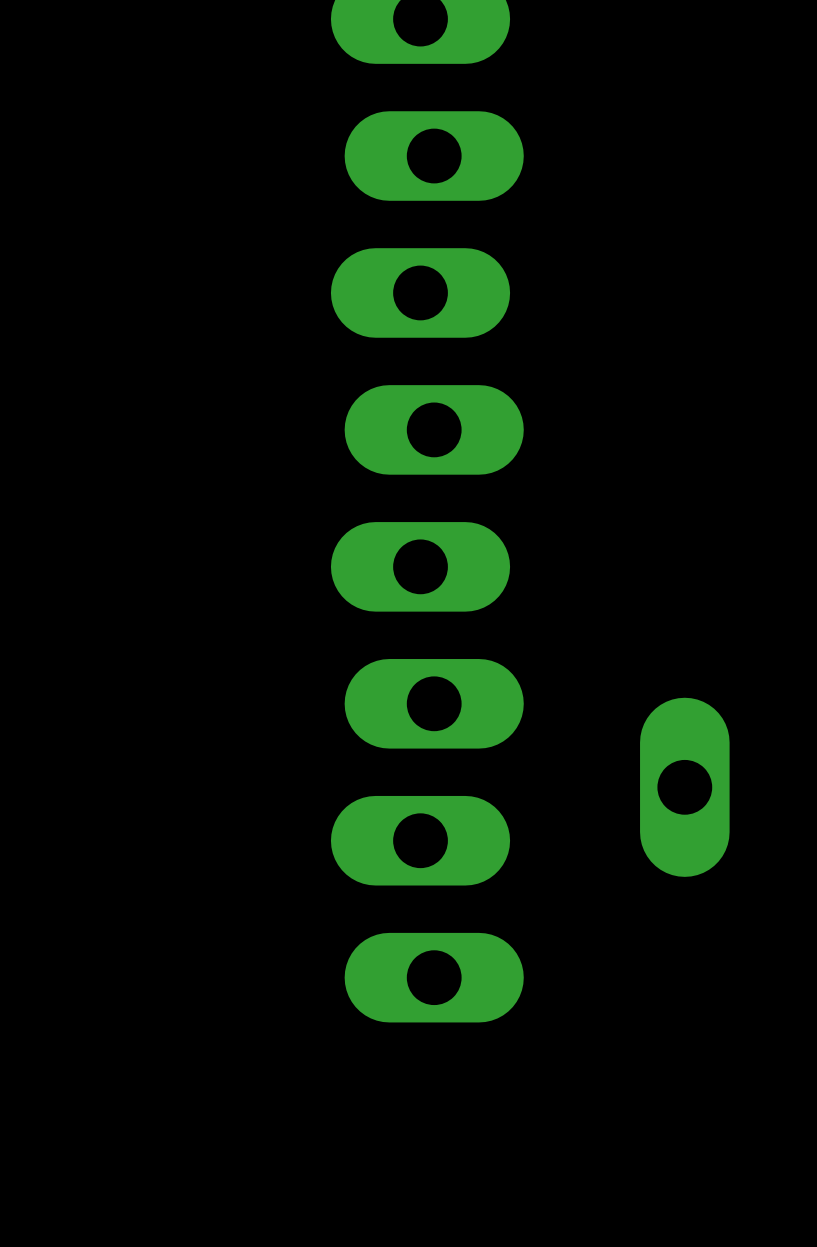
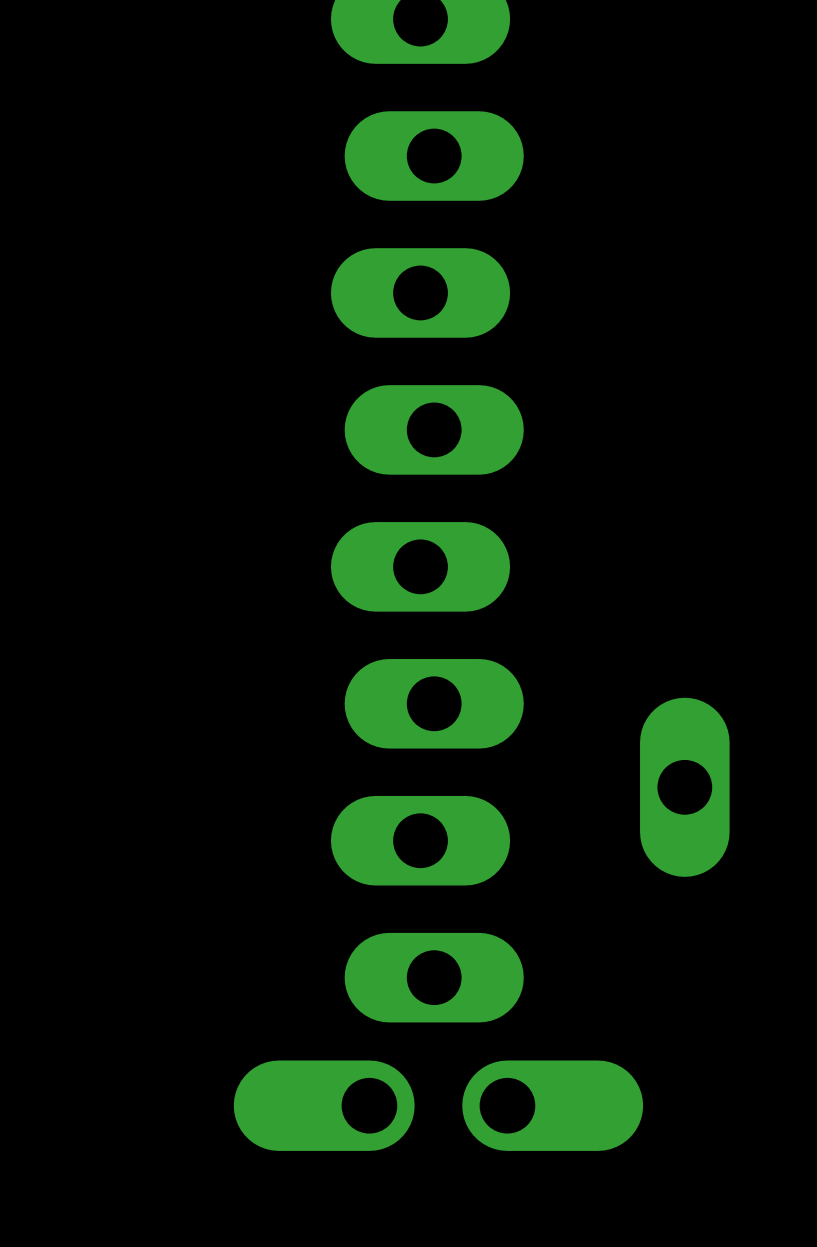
part: none -> (438, 1105)

